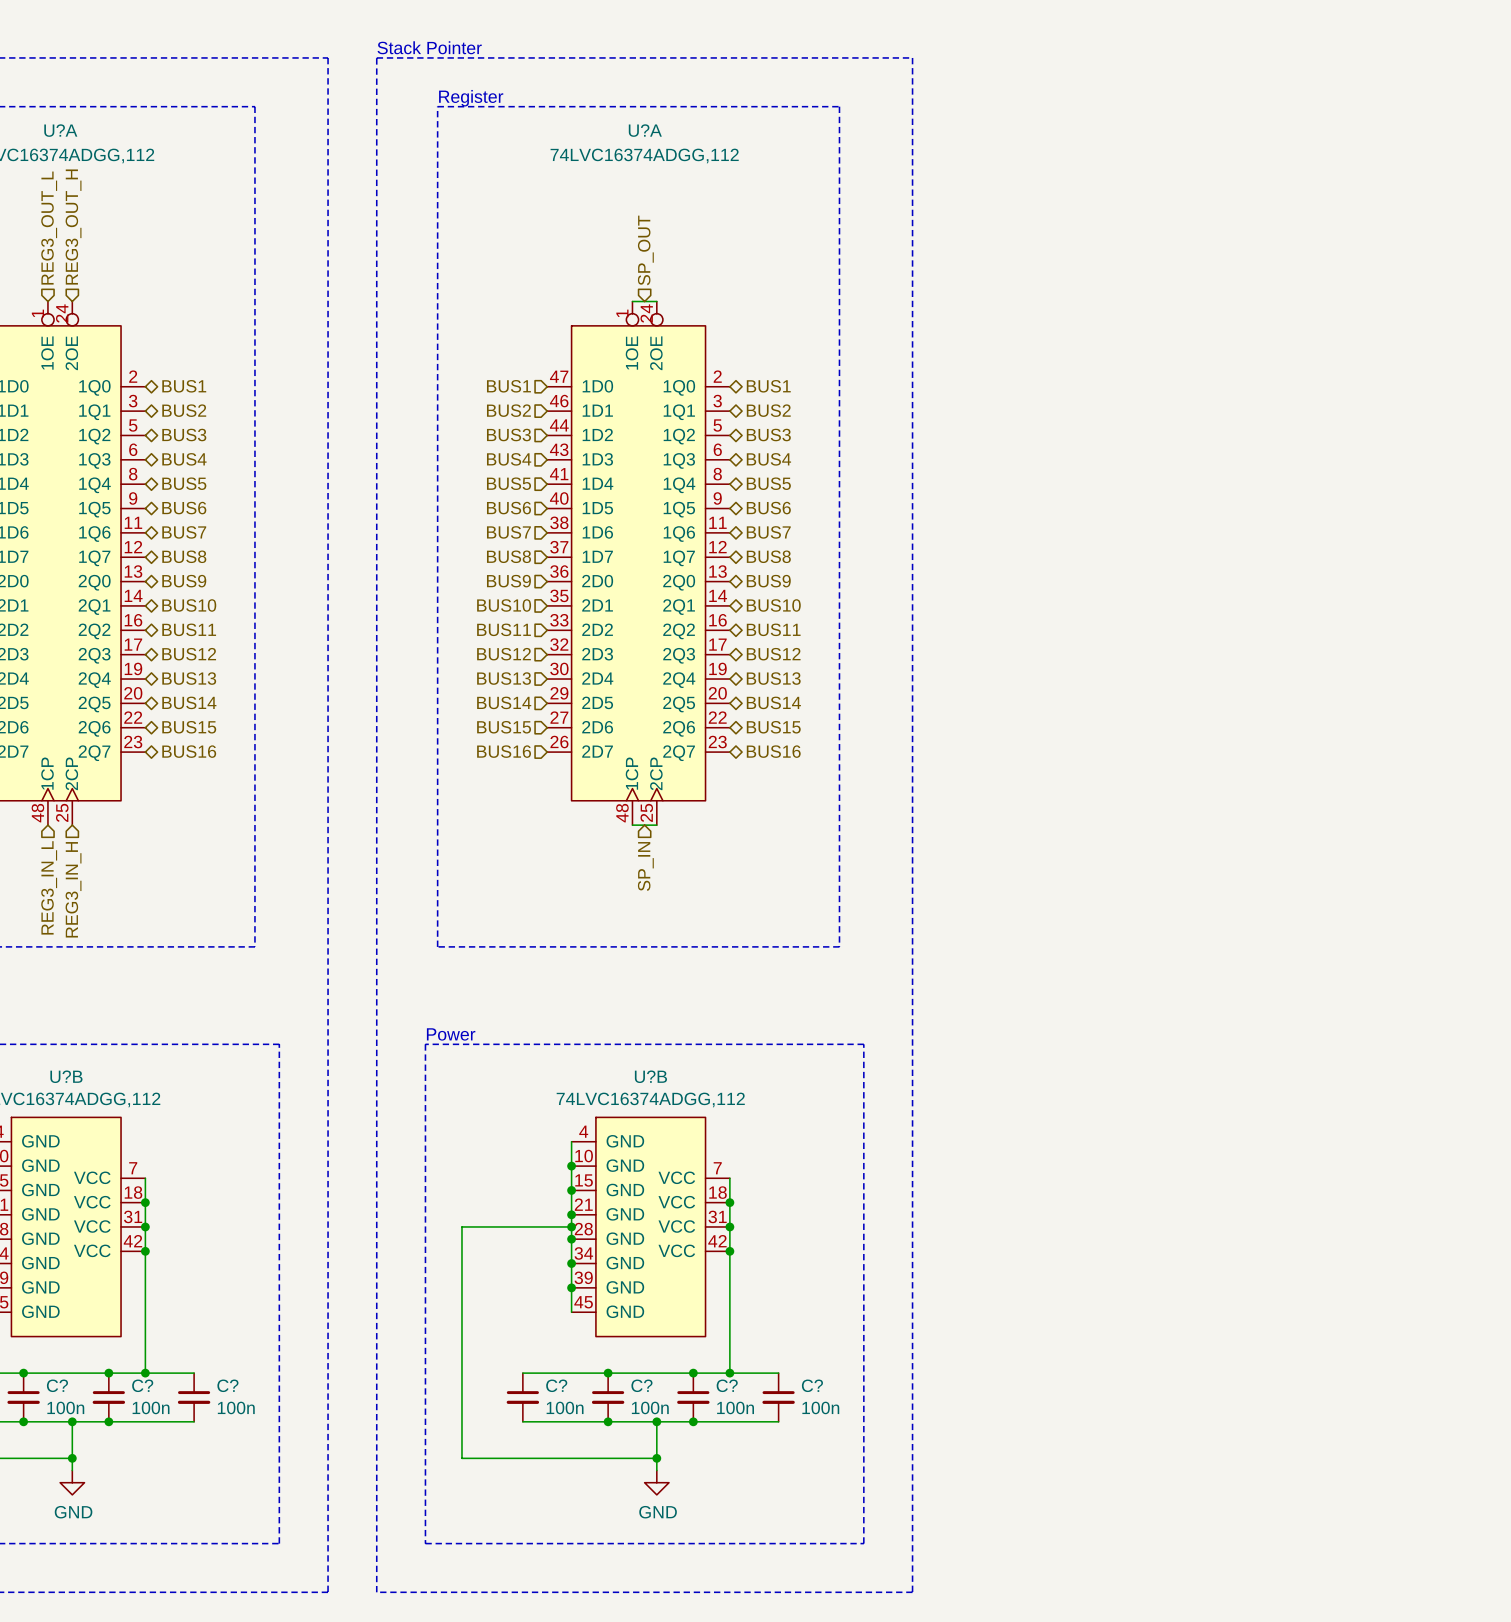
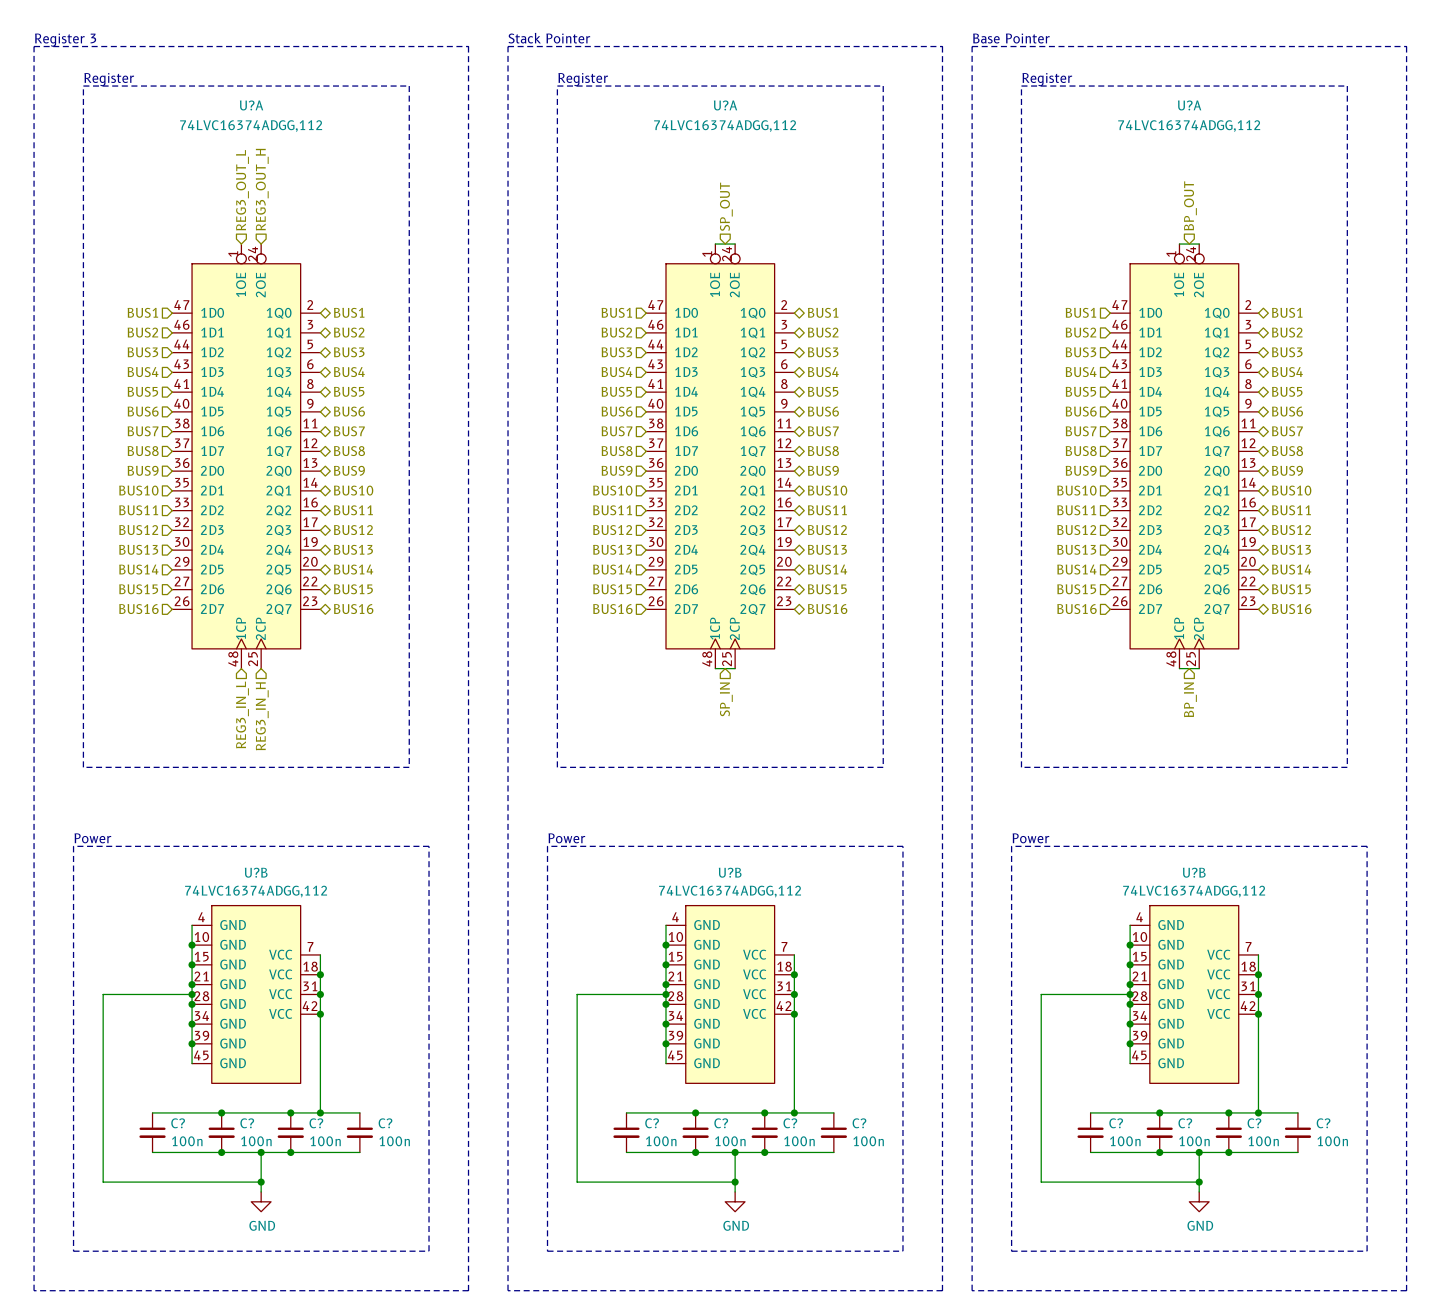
text: none -> Base Pointer (1011, 38)
line: none -> (972, 46) (1406, 46) (1406, 1290) (972, 1290) (972, 46)
text: none -> Register (1047, 79)
line: none -> (1021, 86) (1347, 86) (1347, 767) (1021, 767) (1021, 86)
hierarchical label: none -> BP_OUT (1190, 205)
wire: none -> (1179, 244) (1199, 244)
hierarchical label: none -> BUS1 (1080, 312)
hierarchical label: none -> BUS1 (1287, 312)
hierarchical label: none -> BUS2 (1080, 332)
hierarchical label: none -> BUS2 (1287, 332)
hierarchical label: none -> BUS3 (1080, 352)
hierarchical label: none -> BUS3 (1287, 352)
hierarchical label: none -> BUS4 (1081, 372)
hierarchical label: none -> BUS4 (1287, 372)
hierarchical label: none -> BUS5 (1080, 391)
hierarchical label: none -> BUS5 (1287, 391)
hierarchical label: none -> BUS6 (1081, 411)
hierarchical label: none -> BUS6 (1287, 411)
hierarchical label: none -> BUS7 (1081, 431)
hierarchical label: none -> BUS7 (1287, 431)
hierarchical label: none -> BUS8 (1081, 451)
hierarchical label: none -> BUS8 (1287, 451)
U?A: none -> 74LVC16374ADGG,112 (1184, 456)
hierarchical label: none -> BUS9 (1081, 470)
hierarchical label: none -> BUS9 (1287, 470)
hierarchical label: none -> BUS10 (1076, 490)
hierarchical label: none -> BUS10 (1291, 490)
hierarchical label: none -> BUS11 (1076, 510)
hierarchical label: none -> BUS11 (1291, 510)
hierarchical label: none -> BUS12 (1076, 530)
hierarchical label: none -> BUS12 (1291, 530)
hierarchical label: none -> BUS13 (1076, 549)
hierarchical label: none -> BUS13 (1291, 549)
hierarchical label: none -> BUS14 (1076, 569)
hierarchical label: none -> BUS14 (1291, 569)
hierarchical label: none -> BUS15 (1076, 589)
hierarchical label: none -> BUS15 (1291, 589)
hierarchical label: none -> BUS16 (1076, 609)
hierarchical label: none -> BUS16 (1291, 609)
wire: none -> (1179, 668) (1199, 668)
hierarchical label: none -> BP_IN (1190, 699)
text: none -> Power (1030, 838)
line: none -> (1011, 846) (1011, 1251) (1367, 1251) (1367, 846) (1011, 846)
wire: none -> (1130, 925) (1130, 1063)
junction: none -> (1130, 945)
wire: none -> (1258, 954) (1258, 1112)
junction: none -> (1130, 964)
junction: none -> (1258, 974)
junction: none -> (1130, 984)
wire: none -> (1130, 994) (1041, 994) (1041, 1182) (1199, 1182)
junction: none -> (1130, 994)
U?B: none -> 74LVC16374ADGG,112 (1194, 994)
junction: none -> (1258, 994)
junction: none -> (1130, 1004)
junction: none -> (1258, 1014)
junction: none -> (1130, 1024)
junction: none -> (1130, 1043)
wire: none -> (1090, 1112) (1297, 1112)
junction: none -> (1159, 1112)
junction: none -> (1228, 1112)
junction: none -> (1258, 1112)
C?: none -> 100n (1090, 1132)
C?: none -> 100n (1159, 1132)
C?: none -> 100n (1228, 1132)
C?: none -> 100n (1297, 1132)
wire: none -> (1090, 1152) (1297, 1152)
junction: none -> (1159, 1152)
wire: none -> (1199, 1152) (1199, 1191)
junction: none -> (1199, 1152)
junction: none -> (1228, 1152)
junction: none -> (1199, 1182)
power symbol: none -> GND (1199, 1201)

